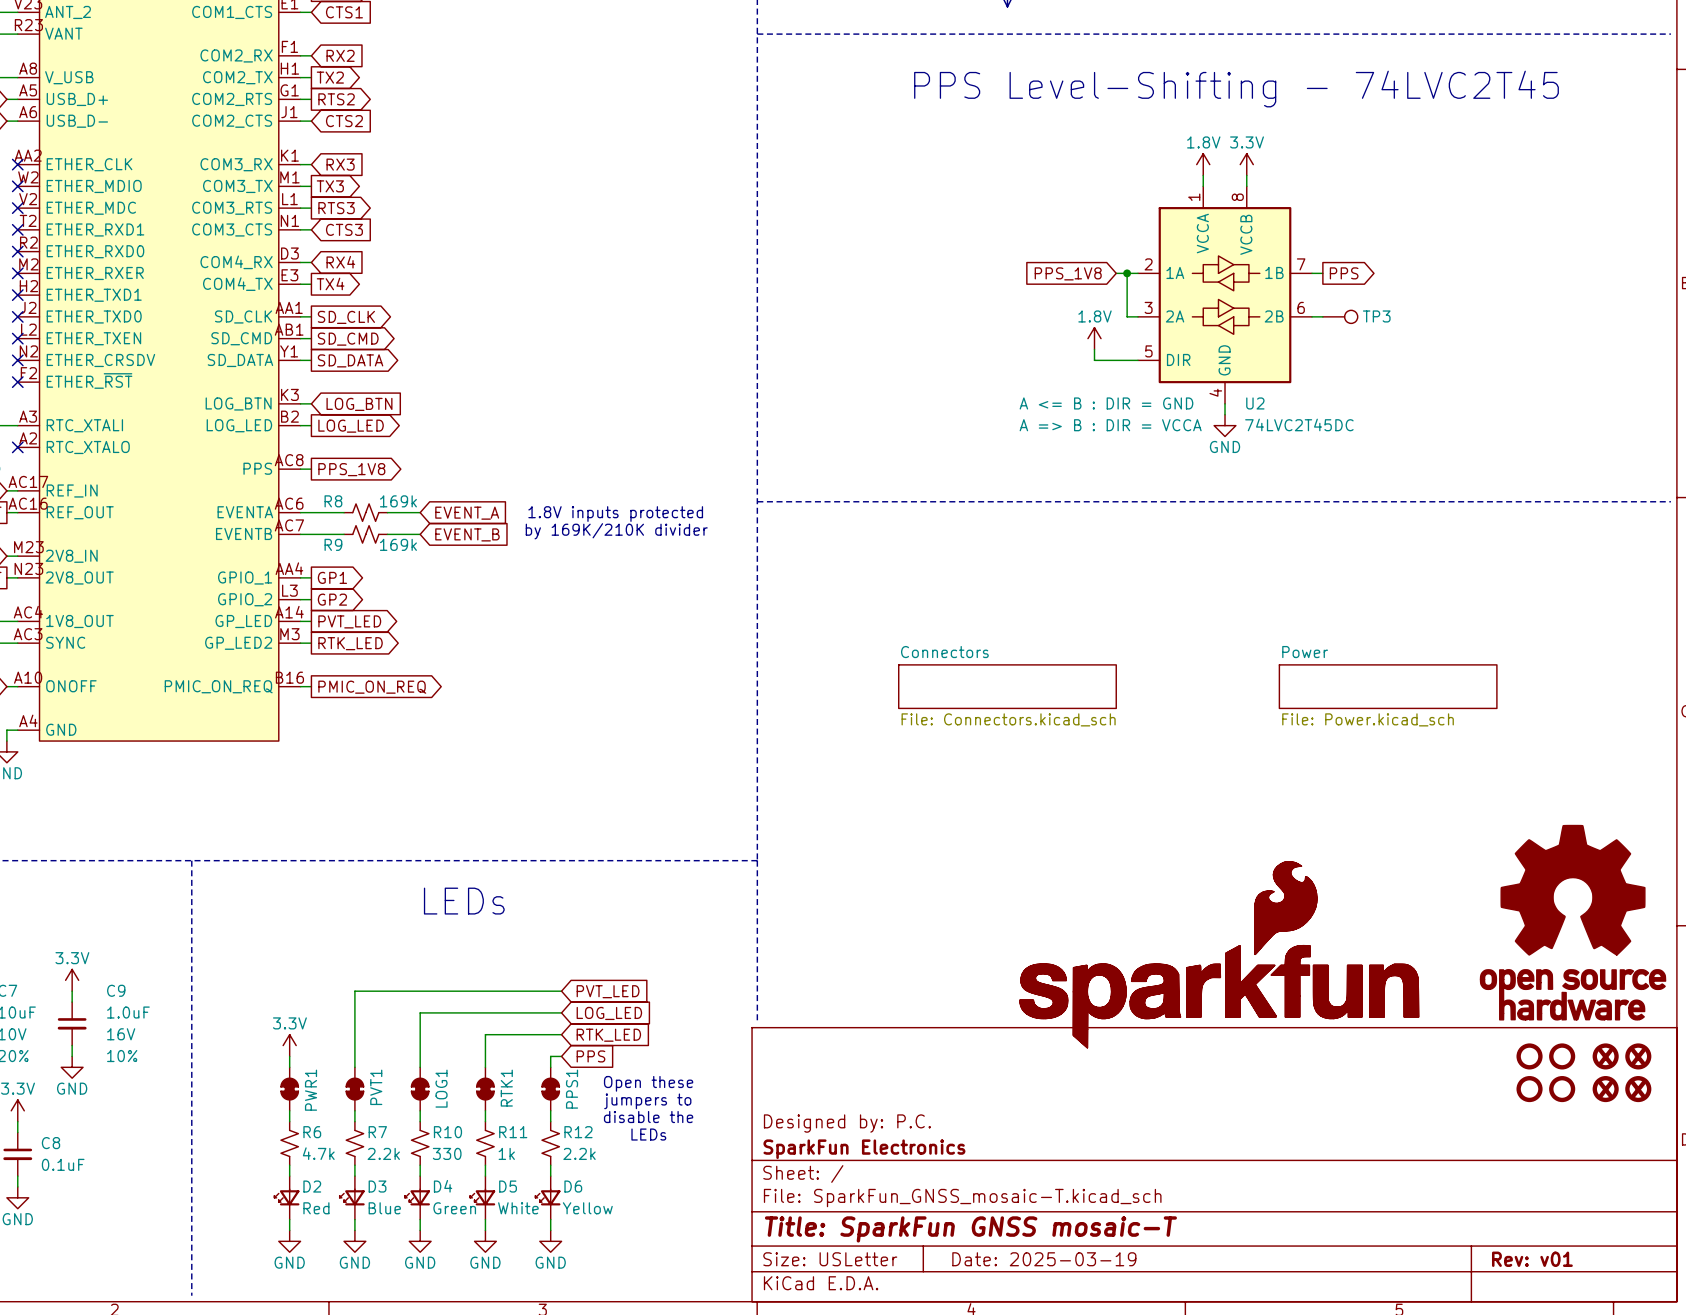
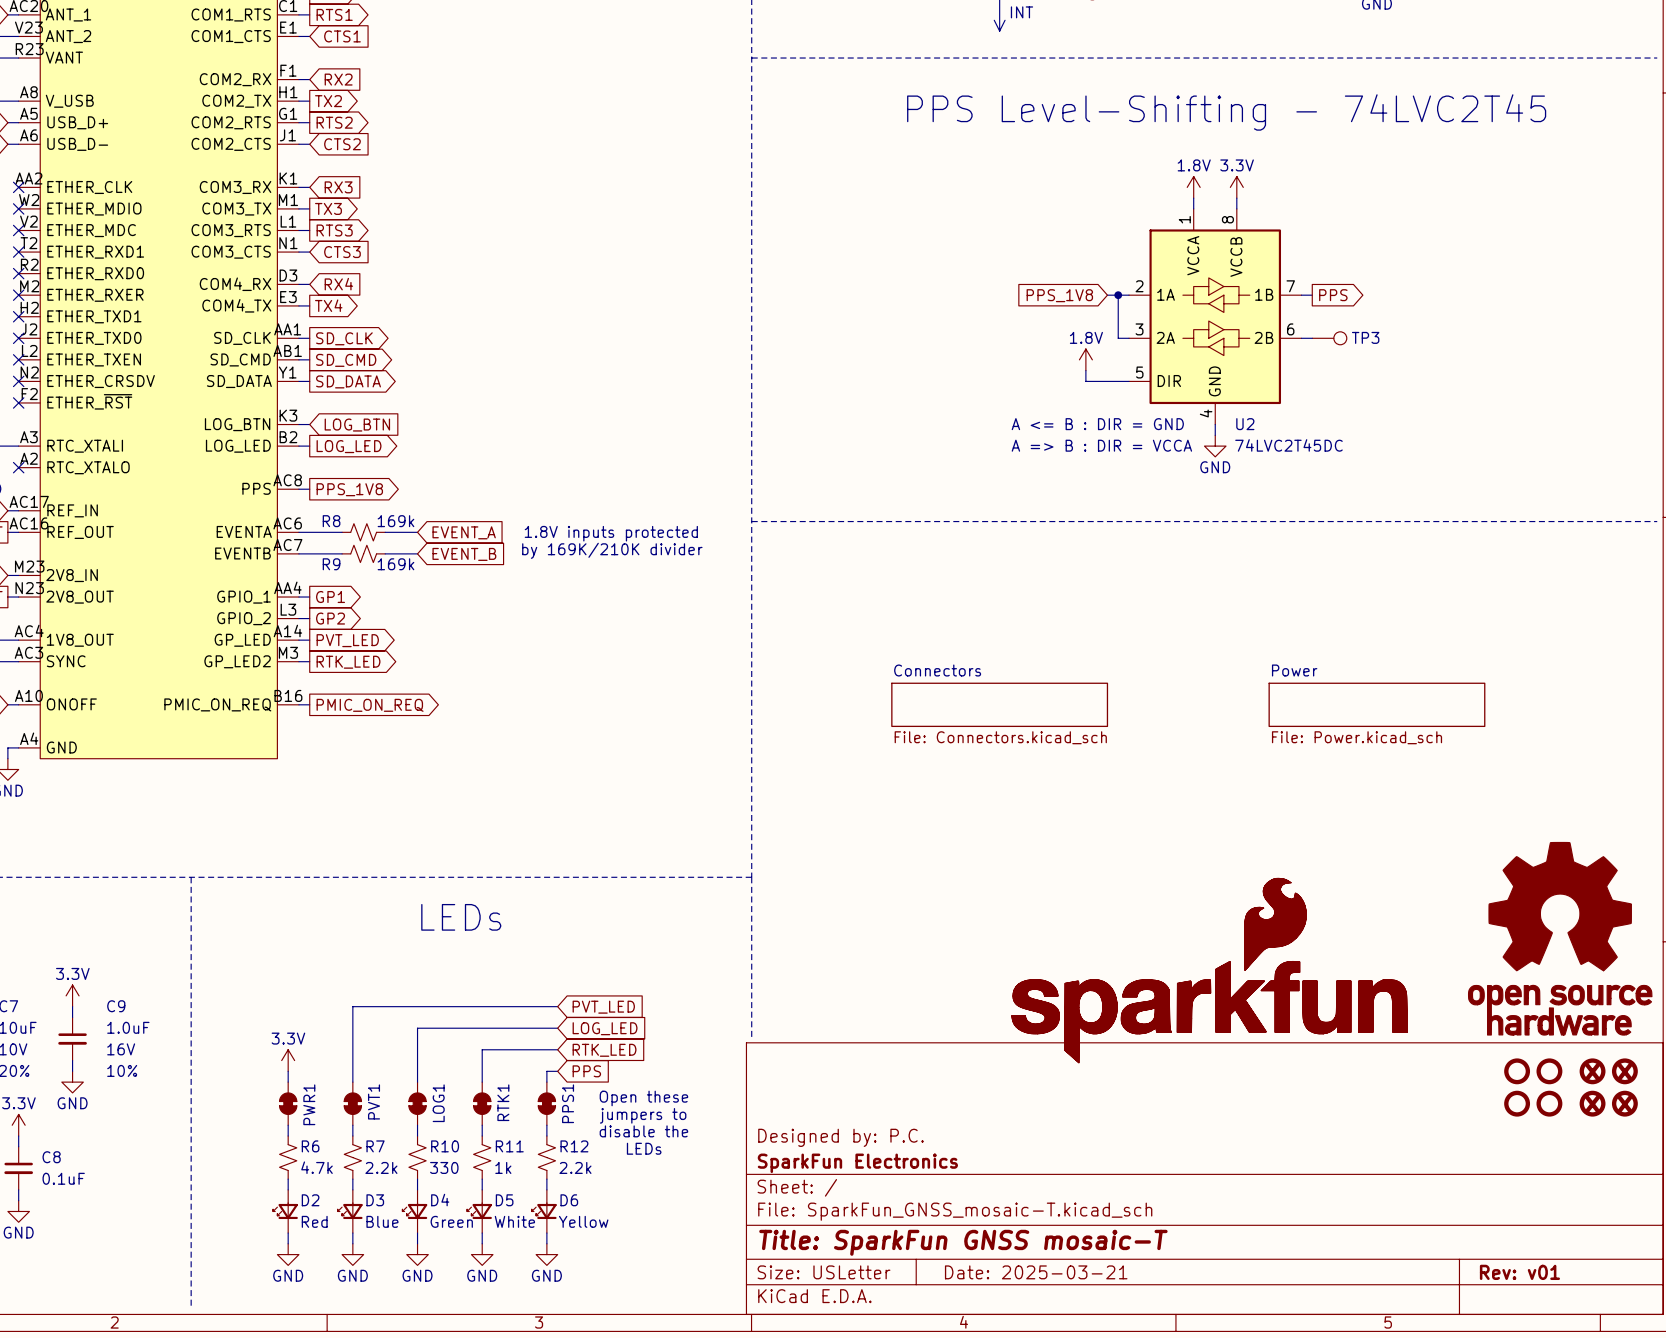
title block: Date: 2025-03-19 (1044, 1259) -> Date: 2025-03-21 (1036, 1272)

